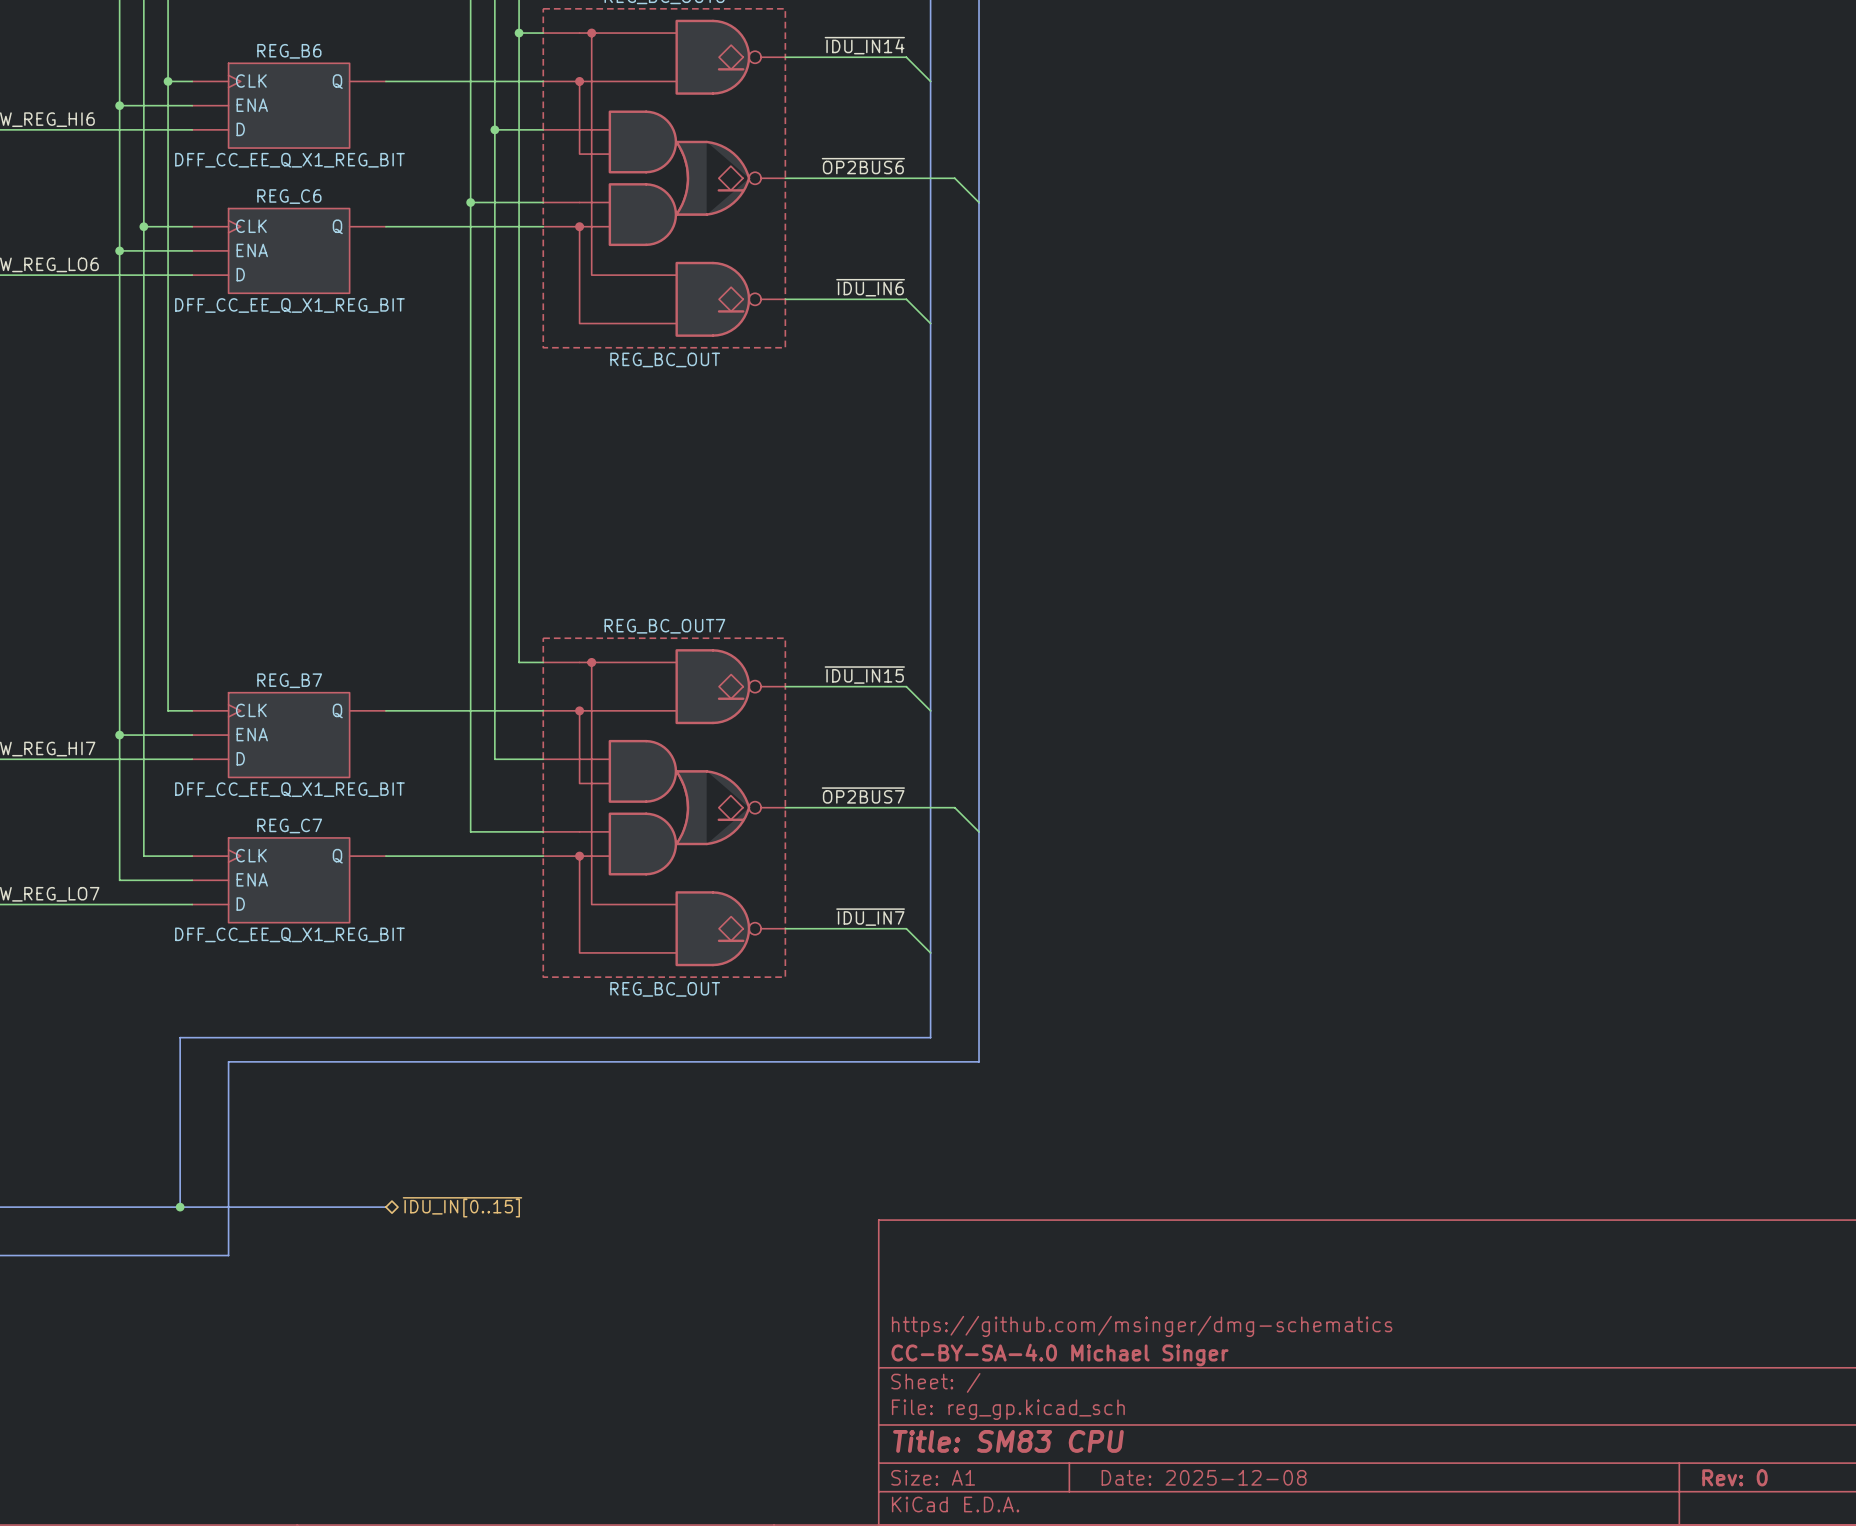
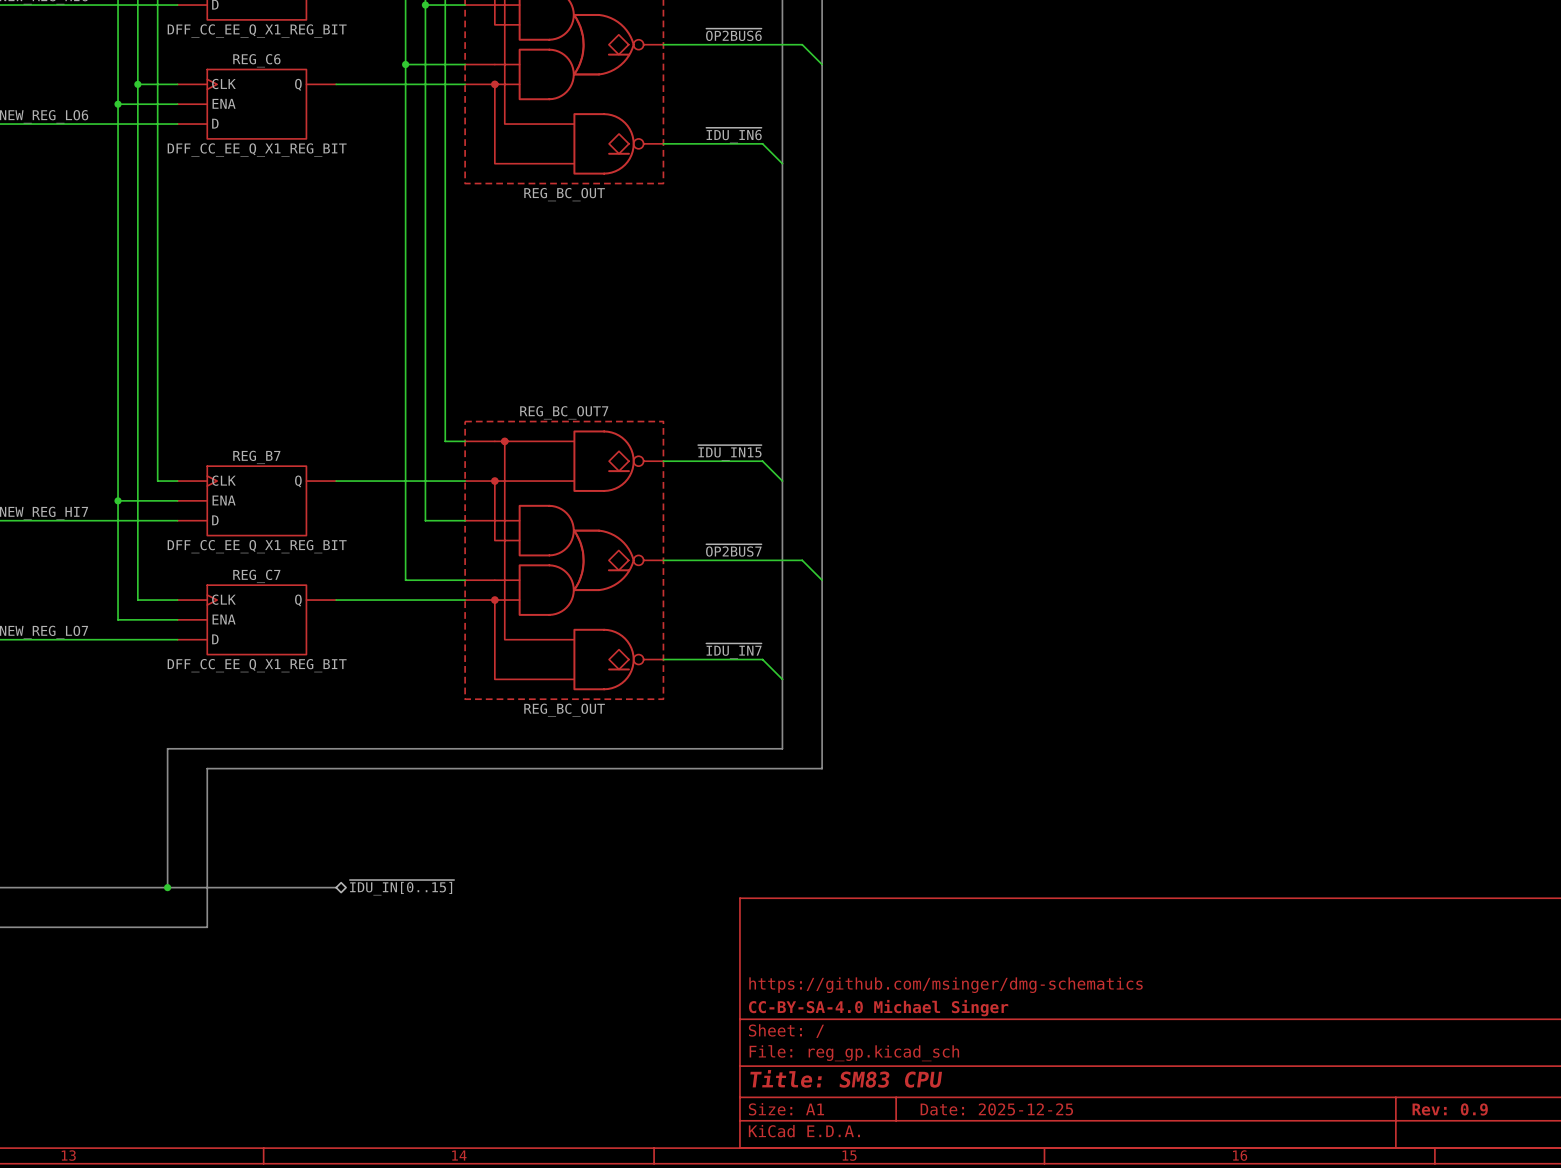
title block: Date: 2025-12-08 (1204, 1477) -> Date: 2025-12-25 (996, 1109)
title block: Rev: 0 (1734, 1477) -> Rev: 0.9 (1450, 1109)

